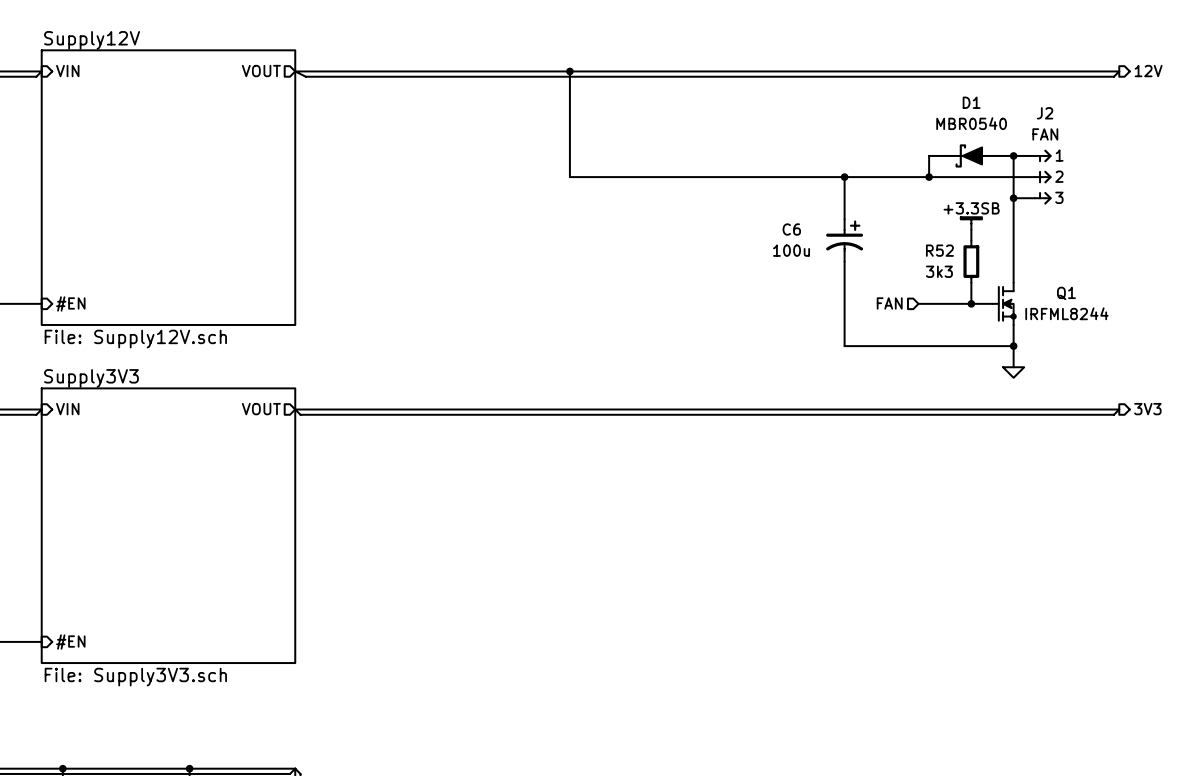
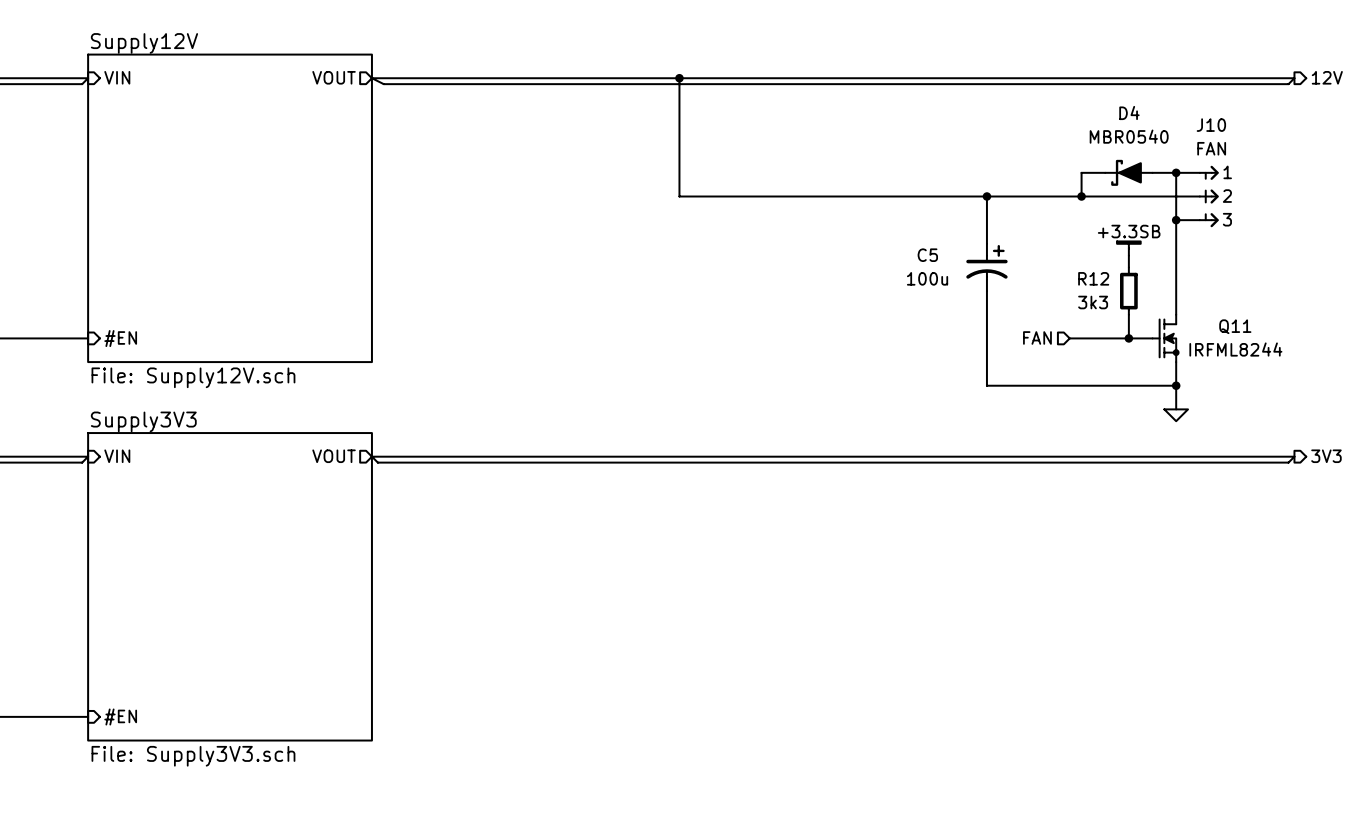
D1 name: D1 (971, 102) -> D4 (1129, 112)
J2 name: J2 (1045, 113) -> J10 (1211, 125)
C6 name: C6 (791, 229) -> C5 (927, 255)
R52 name: R52 (939, 250) -> R12 (1093, 278)
Q1 name: Q1 (1066, 293) -> Q11 (1235, 326)

